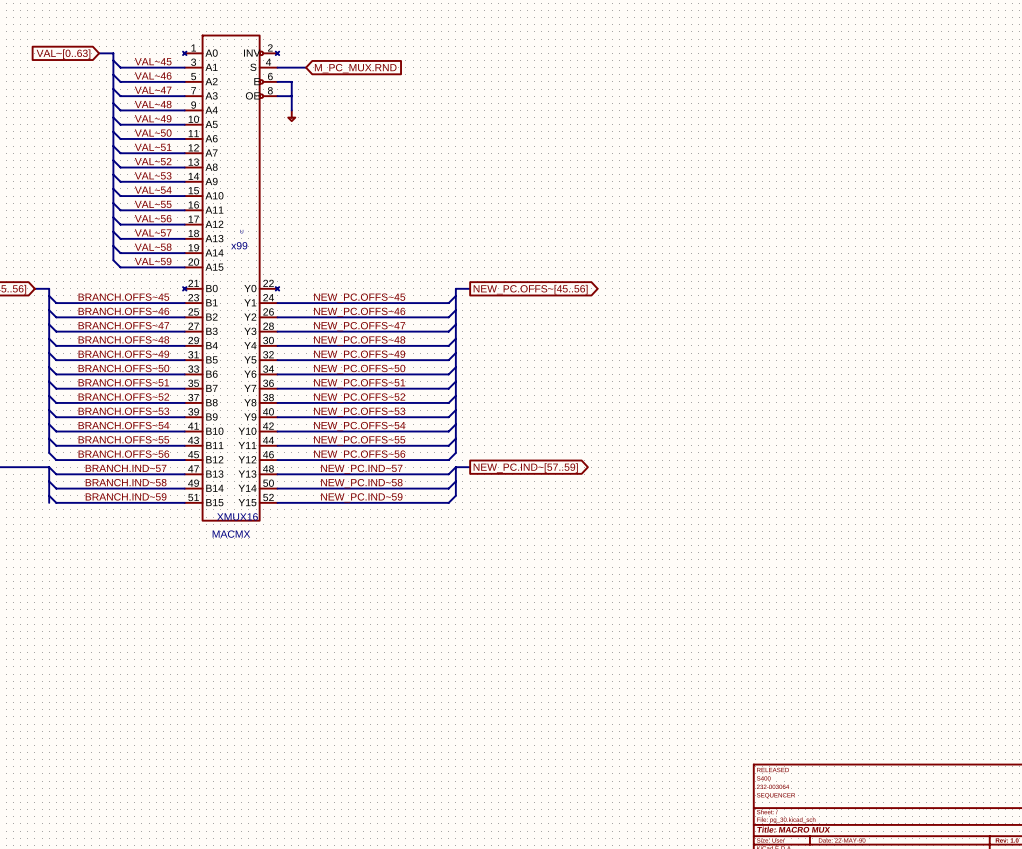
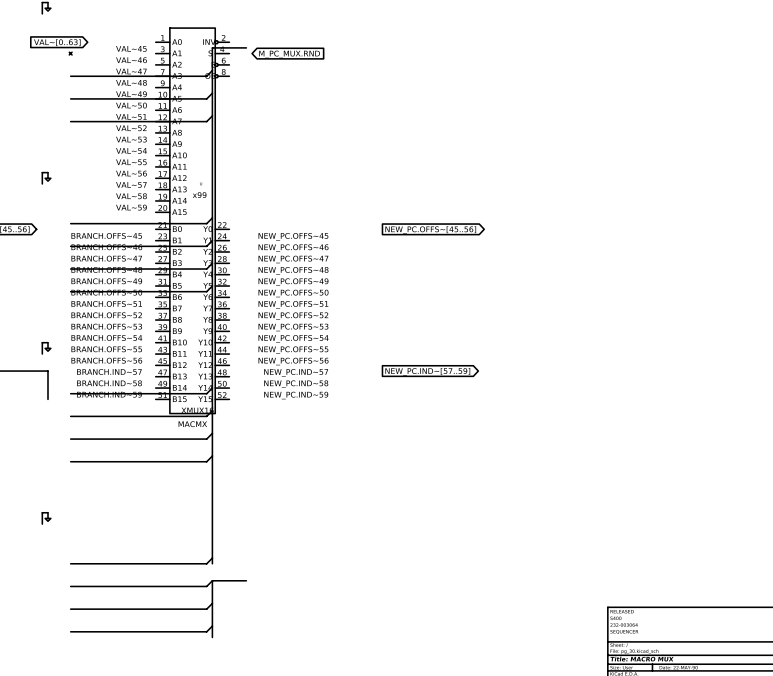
wire: none -> (47, 2) (42, 2) (42, 13)
power symbol: none -> (47, 6)
bus: (99, 53) (113, 53) (113, 260) -> none
no-connect mark: (184, 53) -> none
no-connect mark: (277, 53) -> none
wire: (113, 60) (120, 67) (184, 67) -> none
bus: none -> (246, 47) (212, 47) (212, 563)
no-connect mark: none -> (70, 53)
wire: (277, 67) (306, 67) -> none
wire: (113, 74) (120, 81) (184, 81) -> none
wire: (277, 81) (291, 81) (291, 110) -> none
wire: (113, 89) (120, 96) -> (70, 76) (104, 76)
wire: none -> (212, 70) (206, 76) (155, 76)
wire: (277, 96) (291, 96) -> none
wire: (113, 103) (120, 110) (184, 110) -> none
power symbol: (291, 115) -> none
wire: (113, 117) (120, 124) -> (70, 98) (104, 98)
wire: none -> (212, 93) (206, 98) (155, 98)
wire: (113, 131) (120, 138) (184, 138) -> none
wire: (113, 146) (120, 153) -> (70, 121) (104, 121)
wire: none -> (212, 115) (206, 121) (155, 121)
wire: (113, 160) (120, 167) (184, 167) -> none
wire: (113, 174) (120, 181) (184, 181) -> none
wire: (113, 188) (120, 196) (184, 196) -> none
wire: (113, 203) (120, 210) (184, 210) -> none
wire: none -> (47, 172) (42, 172) (42, 183)
wire: (113, 217) (120, 224) (184, 224) -> none
power symbol: none -> (47, 176)
wire: (113, 231) (120, 238) (184, 238) -> none
wire: (113, 246) (120, 253) (184, 253) -> none
wire: (113, 260) (120, 267) (184, 267) -> none
wire: none -> (212, 217) (206, 223) (70, 223)
bus: (34, 288) (49, 288) (49, 452) -> none
no-connect mark: (184, 288) -> none
no-connect mark: (277, 288) -> none
bus: (470, 288) (455, 288) (455, 452) -> none
wire: (49, 295) (56, 303) (184, 303) -> none
wire: (455, 295) (448, 303) (277, 303) -> none
wire: none -> (212, 240) (206, 246) (70, 246)
wire: (49, 310) (56, 317) (184, 317) -> none
wire: (455, 310) (448, 317) (277, 317) -> none
wire: (49, 324) (56, 331) (184, 331) -> none
wire: (455, 324) (448, 331) (277, 331) -> none
wire: none -> (212, 263) (206, 269) (70, 269)
wire: (49, 338) (56, 345) (184, 345) -> none
wire: (455, 338) (448, 345) (277, 345) -> none
wire: (49, 353) (56, 360) (184, 360) -> none
wire: (455, 353) (448, 360) (277, 360) -> none
wire: none -> (212, 286) (206, 291) (70, 291)
wire: (49, 367) (56, 374) (184, 374) -> none
wire: (455, 367) (448, 374) (277, 374) -> none
wire: (49, 381) (56, 388) (184, 388) -> none
wire: (455, 381) (448, 388) (277, 388) -> none
wire: (49, 395) (56, 402) (184, 402) -> none
wire: (455, 395) (448, 402) (277, 402) -> none
wire: (49, 410) (56, 417) (184, 417) -> none
wire: (455, 410) (448, 417) (277, 417) -> none
wire: (49, 424) (56, 431) (184, 431) -> none
wire: (455, 424) (448, 431) (277, 431) -> none
wire: none -> (47, 342) (42, 342) (42, 354)
power symbol: none -> (47, 347)
wire: (49, 438) (56, 445) (184, 445) -> none
wire: (455, 438) (448, 445) (277, 445) -> none
wire: (49, 452) (56, 460) (184, 460) -> none
wire: (455, 452) (448, 460) (277, 460) -> none
wire: (49, 467) (56, 474) (184, 474) -> none
wire: (455, 467) (448, 474) (277, 474) -> none
bus: (470, 467) (455, 467) (455, 495) -> none
wire: (49, 481) (56, 488) (184, 488) -> none
wire: (455, 481) (448, 488) (277, 488) -> none
wire: none -> (212, 388) (206, 393) (70, 393)
wire: (49, 495) (56, 502) (184, 502) -> none
wire: (455, 495) (448, 502) (277, 502) -> none
wire: none -> (212, 410) (206, 416) (70, 416)
wire: none -> (212, 433) (206, 439) (70, 439)
wire: none -> (212, 456) (206, 461) (70, 461)
wire: none -> (47, 512) (42, 512) (42, 524)
power symbol: none -> (47, 517)
wire: none -> (212, 558) (206, 563) (70, 563)
wire: none -> (212, 580) (206, 586) (70, 586)
bus: none -> (246, 580) (212, 580) (212, 637)
wire: none -> (212, 603) (206, 609) (70, 609)
wire: none -> (212, 626) (206, 631) (70, 631)

